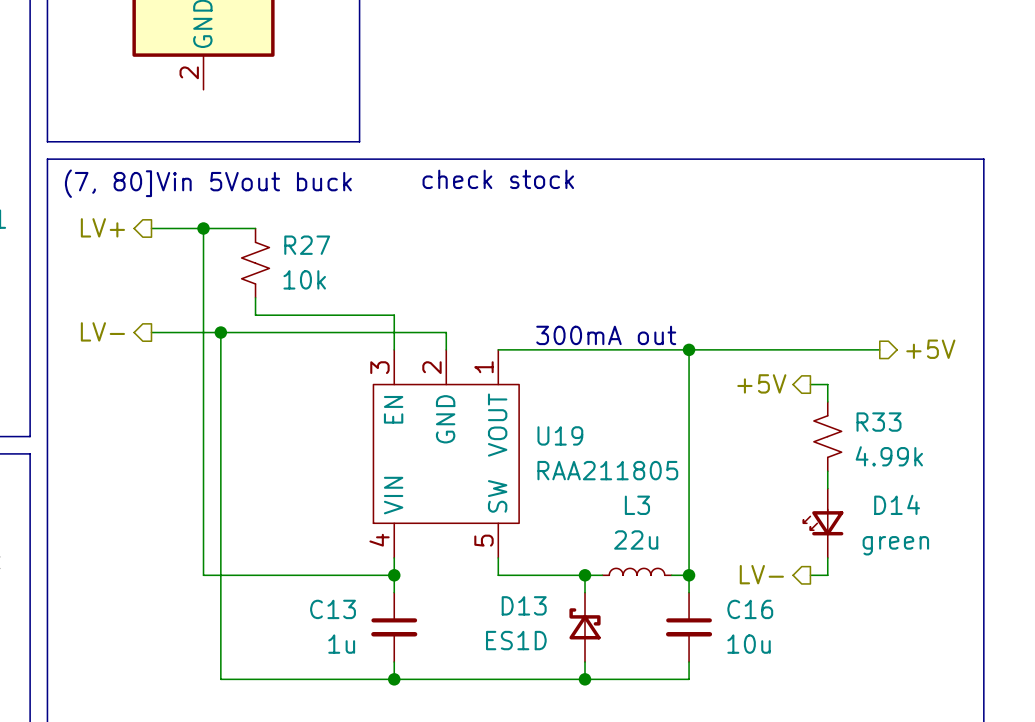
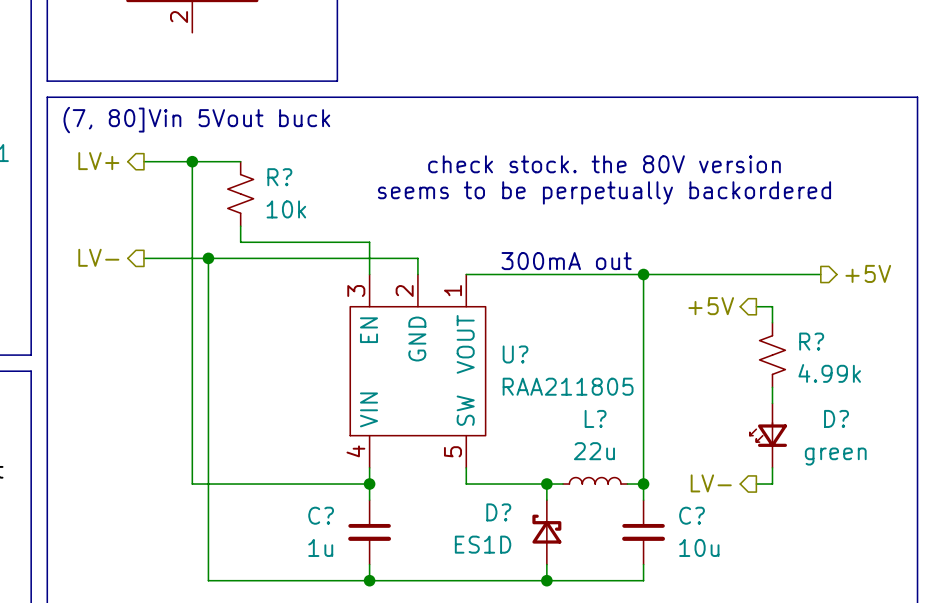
text: check stock (498, 179) -> none
text: none -> check stock. the 80V version (604, 164)
R27 name: R27 (307, 245) -> R? (279, 177)
text: none -> seems to be perpetually backordered (604, 192)
R33 name: R33 (879, 422) -> R? (811, 341)
U19 name: U19 (560, 435) -> U? (515, 354)
D14 name: D14 (897, 504) -> D? (836, 418)
L3 name: L3 (637, 505) -> L? (595, 418)
D13 name: D13 (524, 605) -> D? (498, 512)
C13 name: C13 (333, 609) -> C? (321, 515)
C16 name: C16 (750, 609) -> C? (692, 515)

